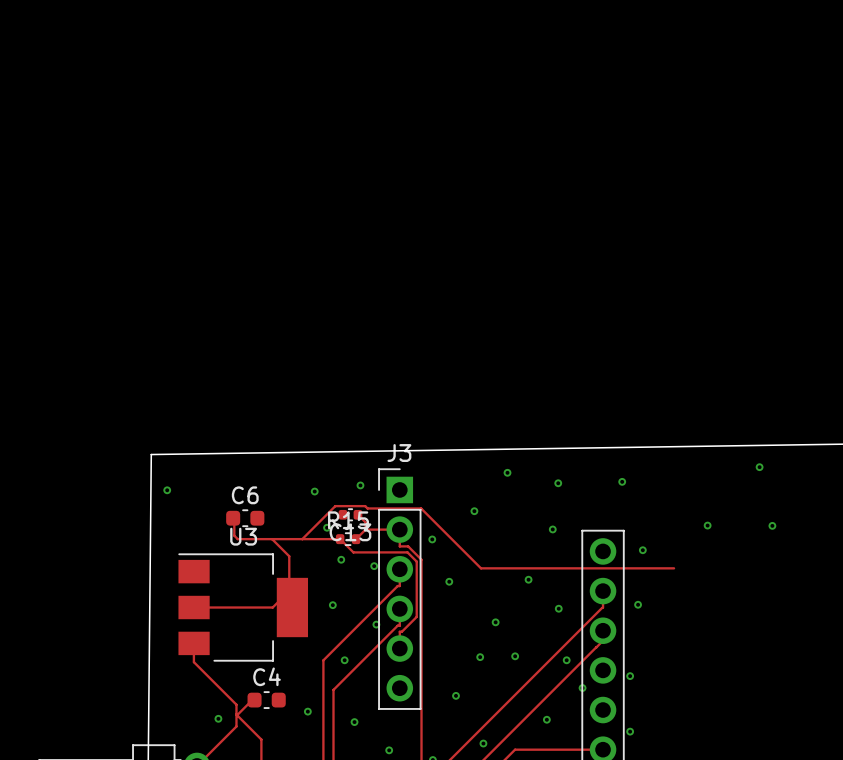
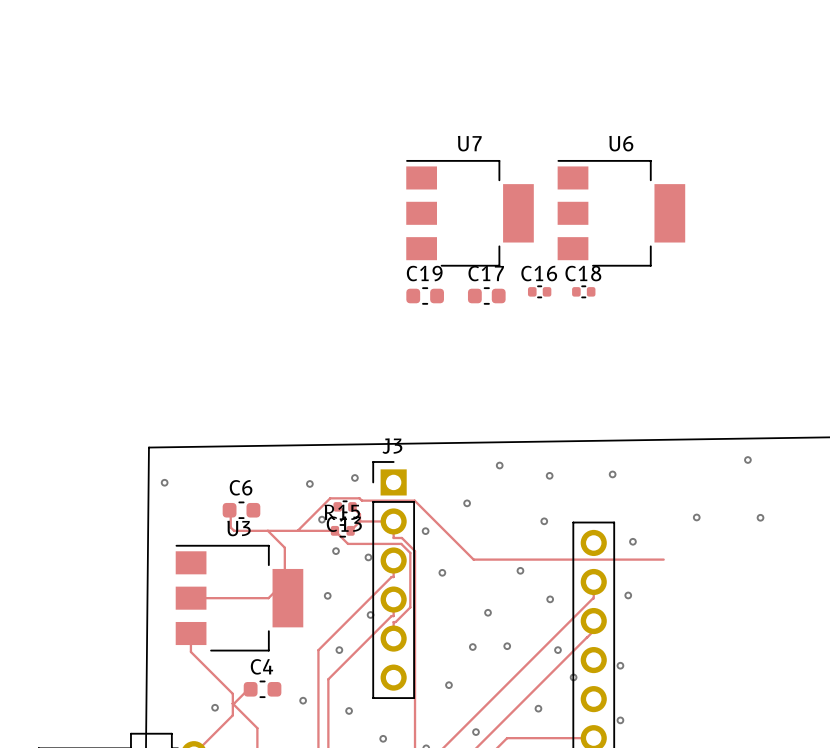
U7: none -> (469, 213)
U6: none -> (621, 213)
C16: none -> (539, 291)
C18: none -> (583, 291)
C19: none -> (425, 296)
C17: none -> (486, 296)

